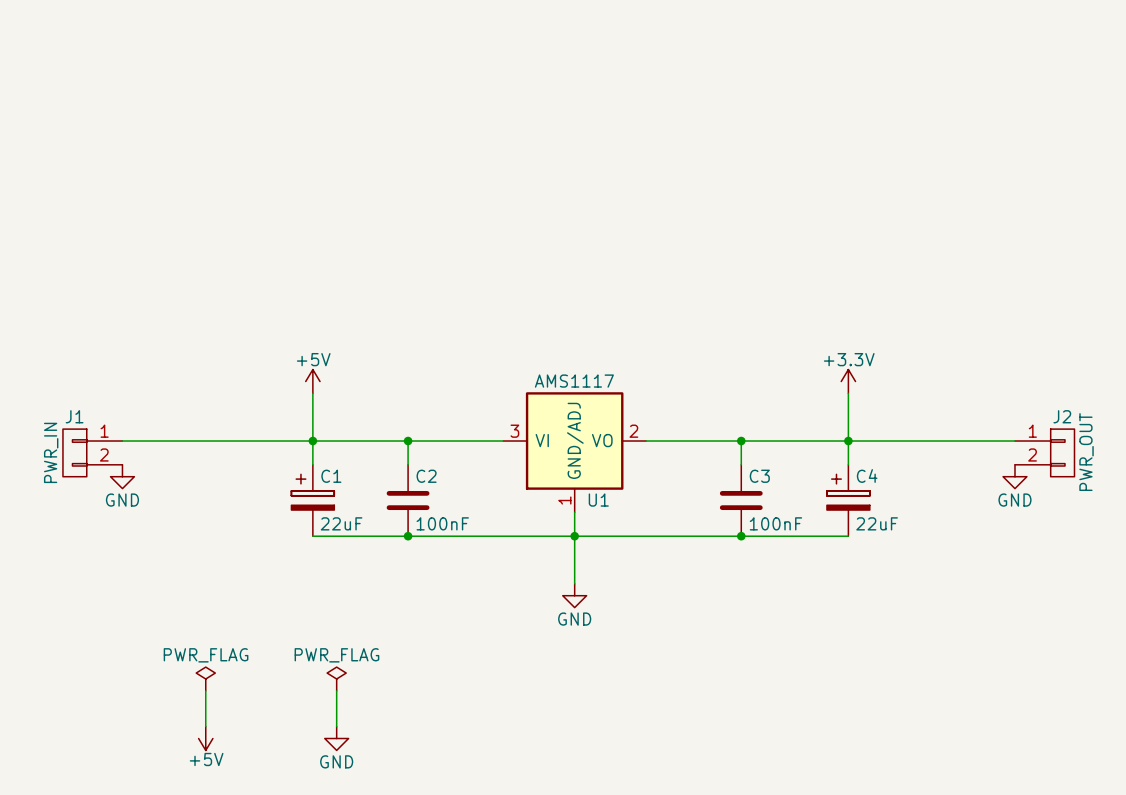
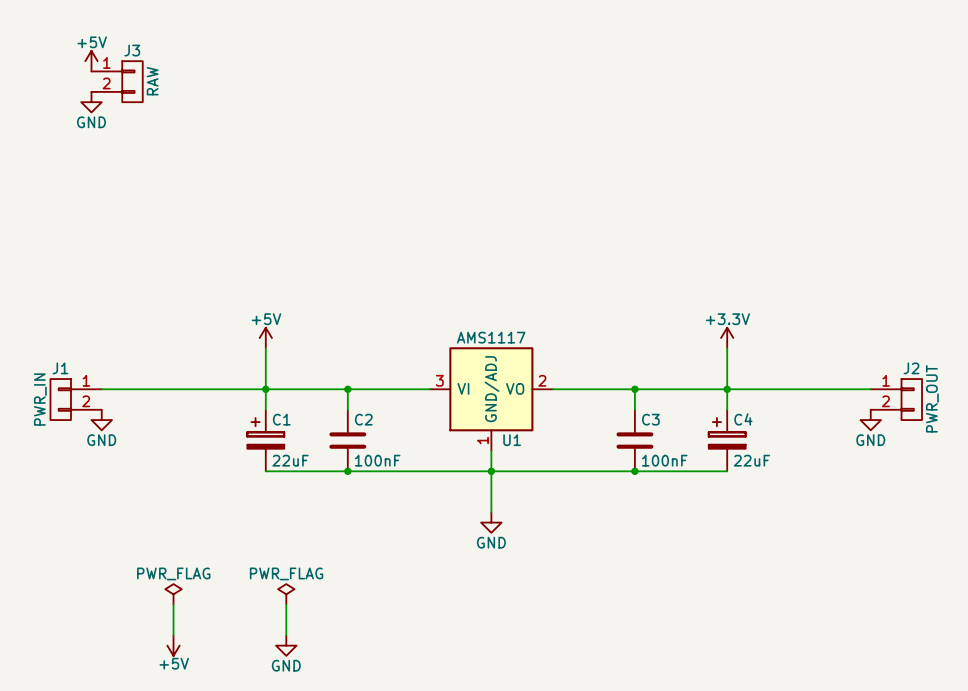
power symbol: none -> +5V (91, 61)
J3: none -> RAW (117, 81)
power symbol: none -> GND (91, 102)

